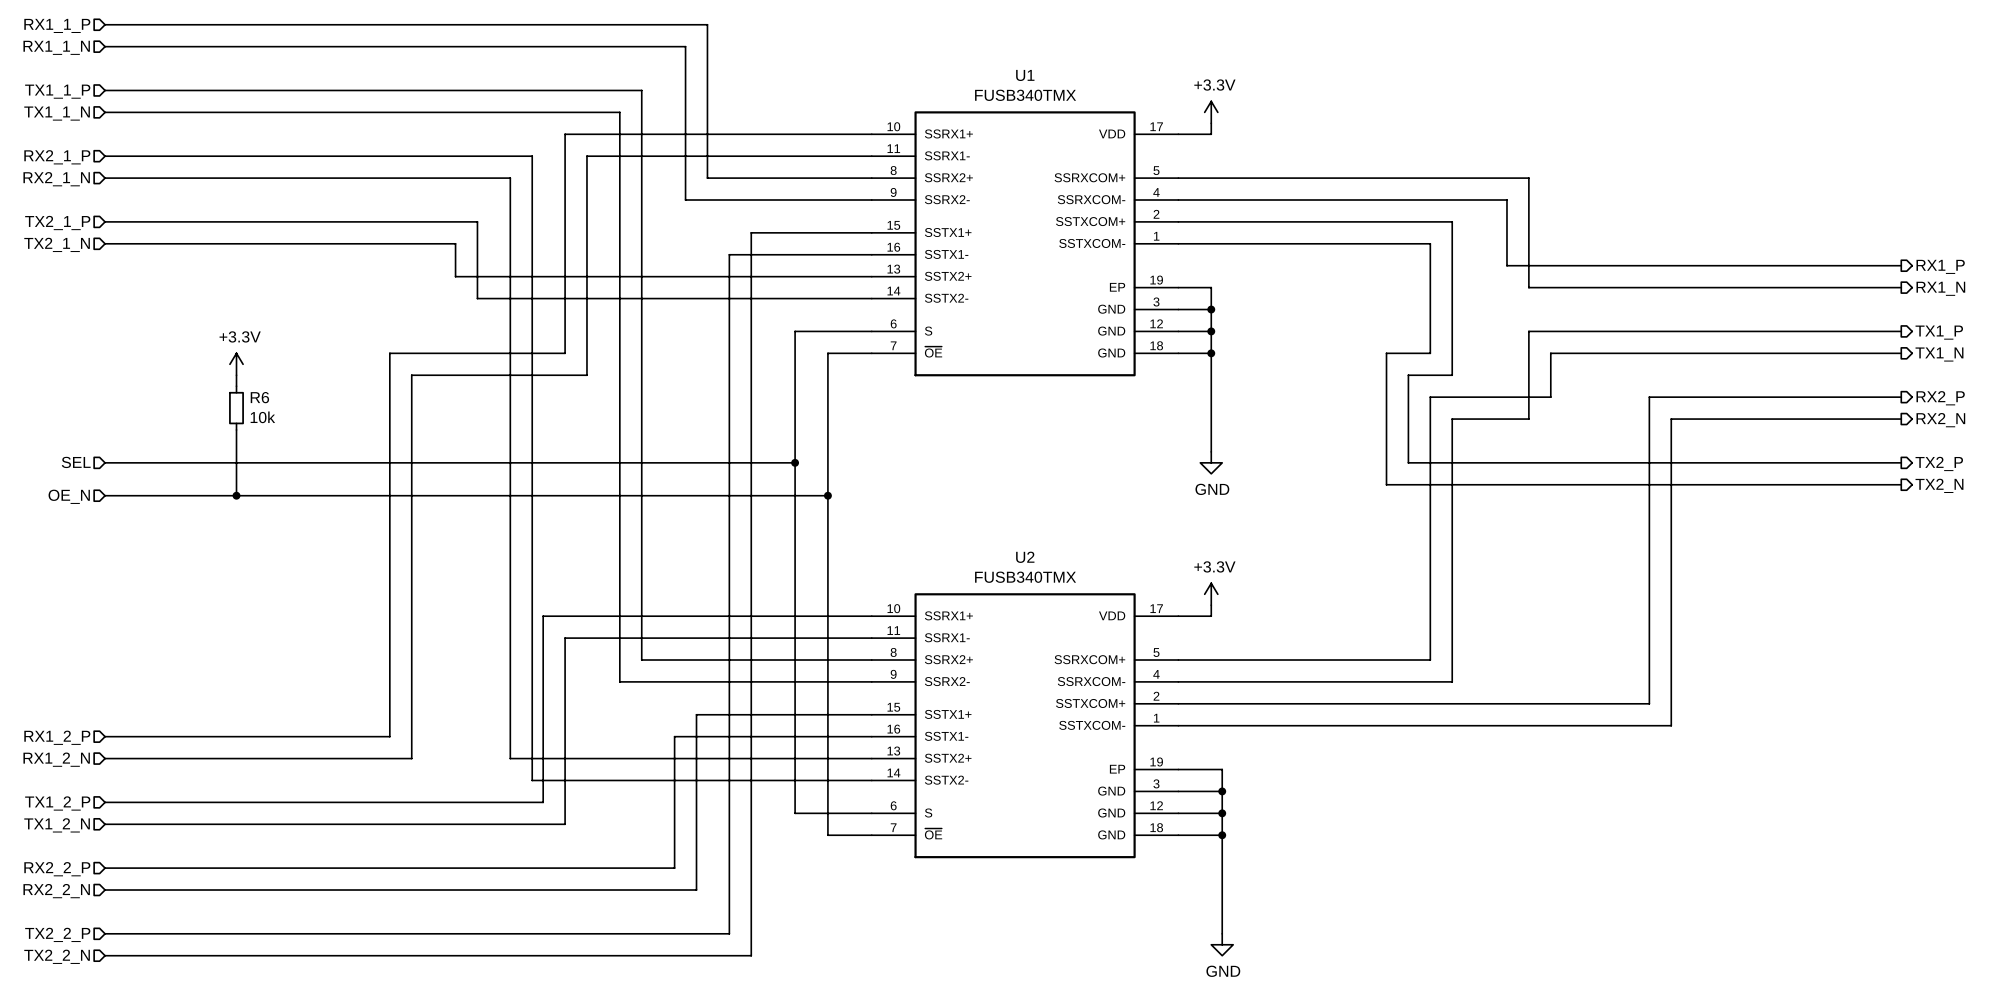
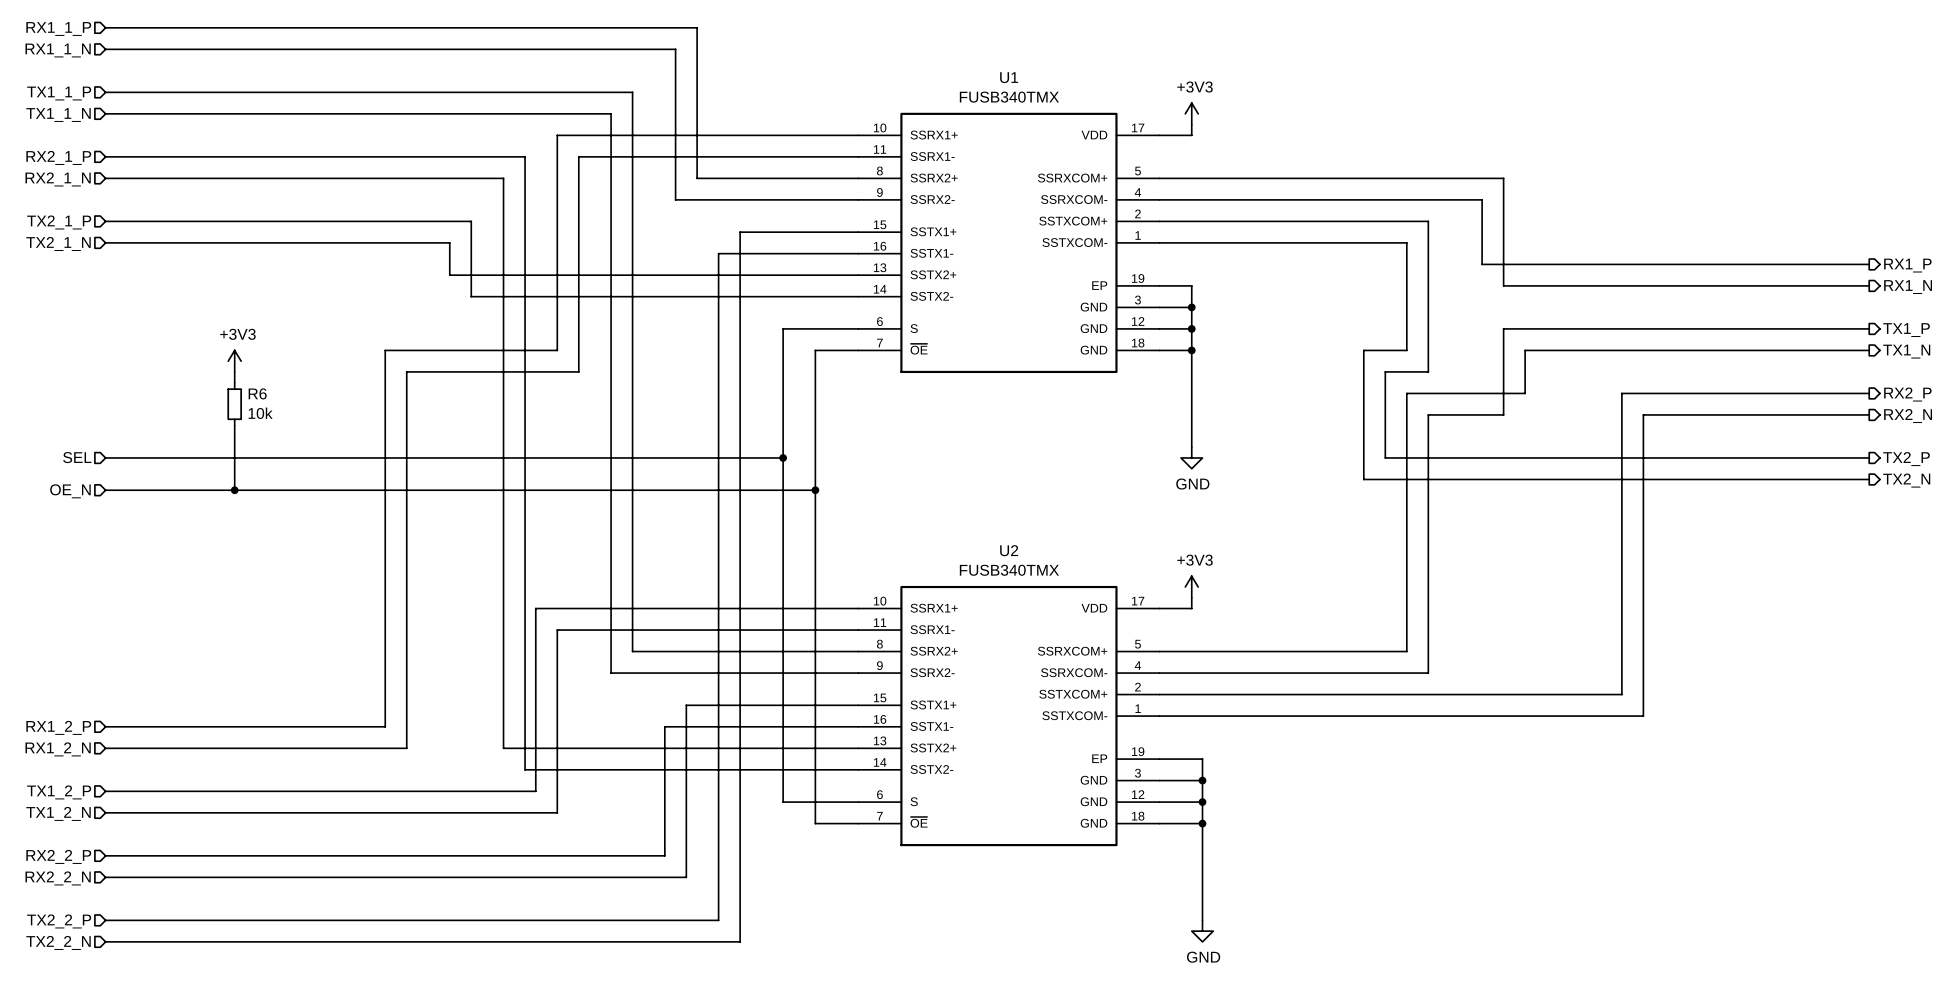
power symbol: +3.3V (1211, 112) -> +3V3 (1191, 113)
power symbol: +3.3V (236, 364) -> +3V3 (234, 361)
power symbol: +3.3V (1211, 594) -> +3V3 (1191, 587)

